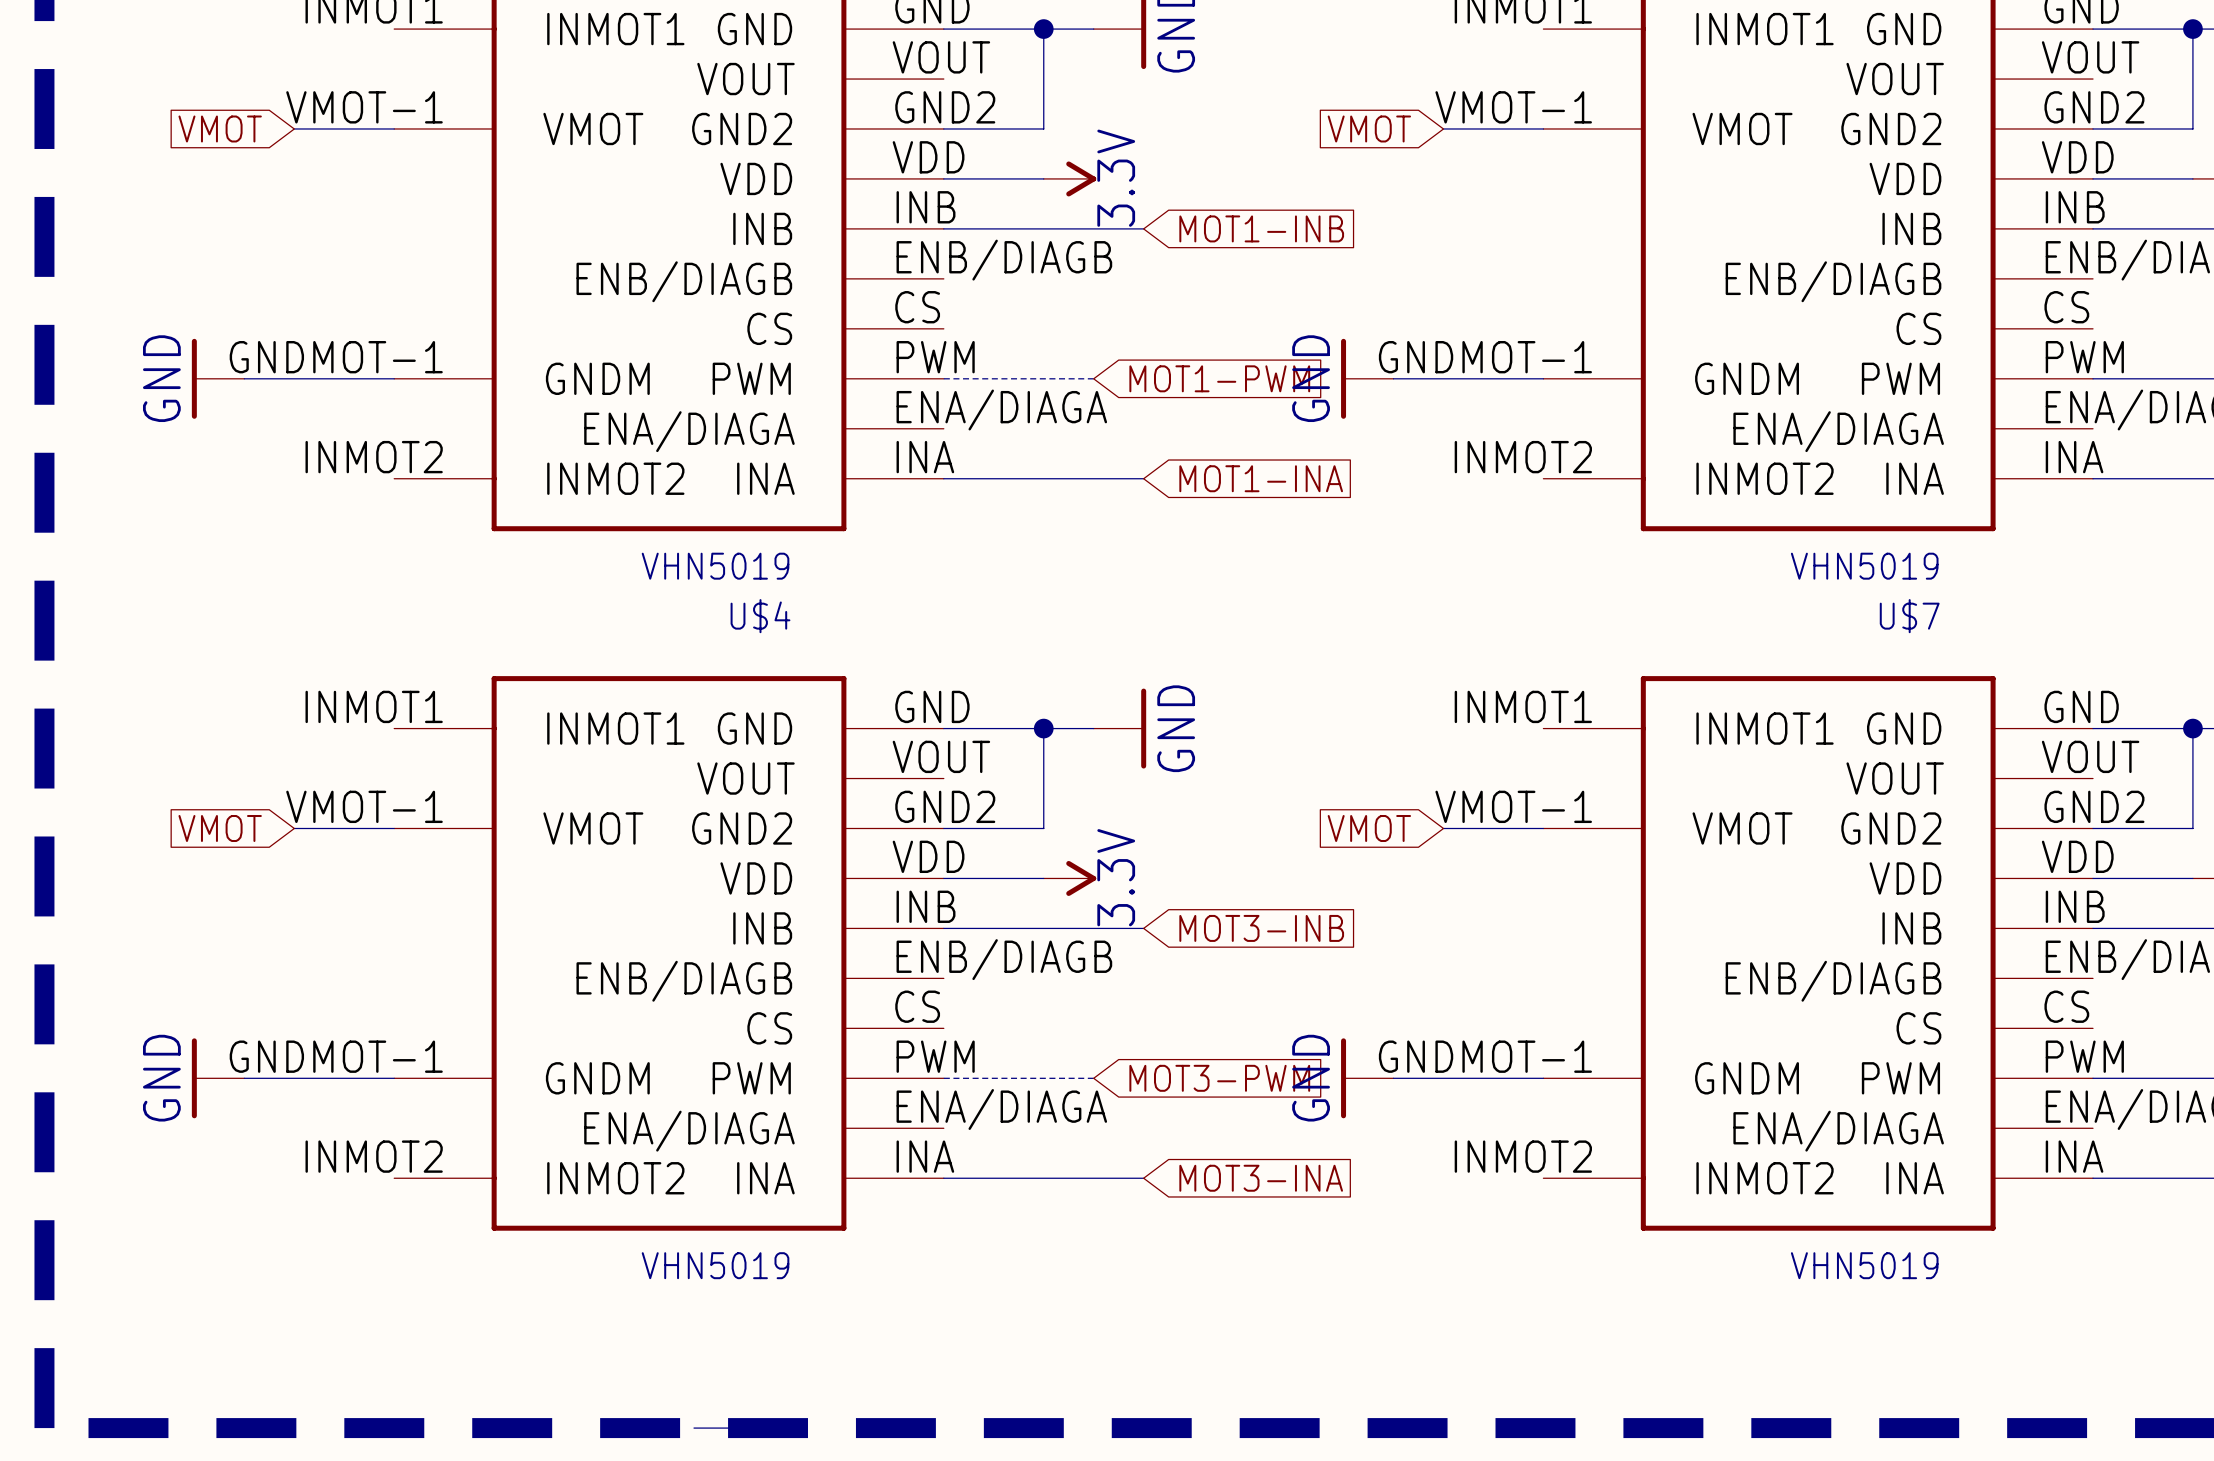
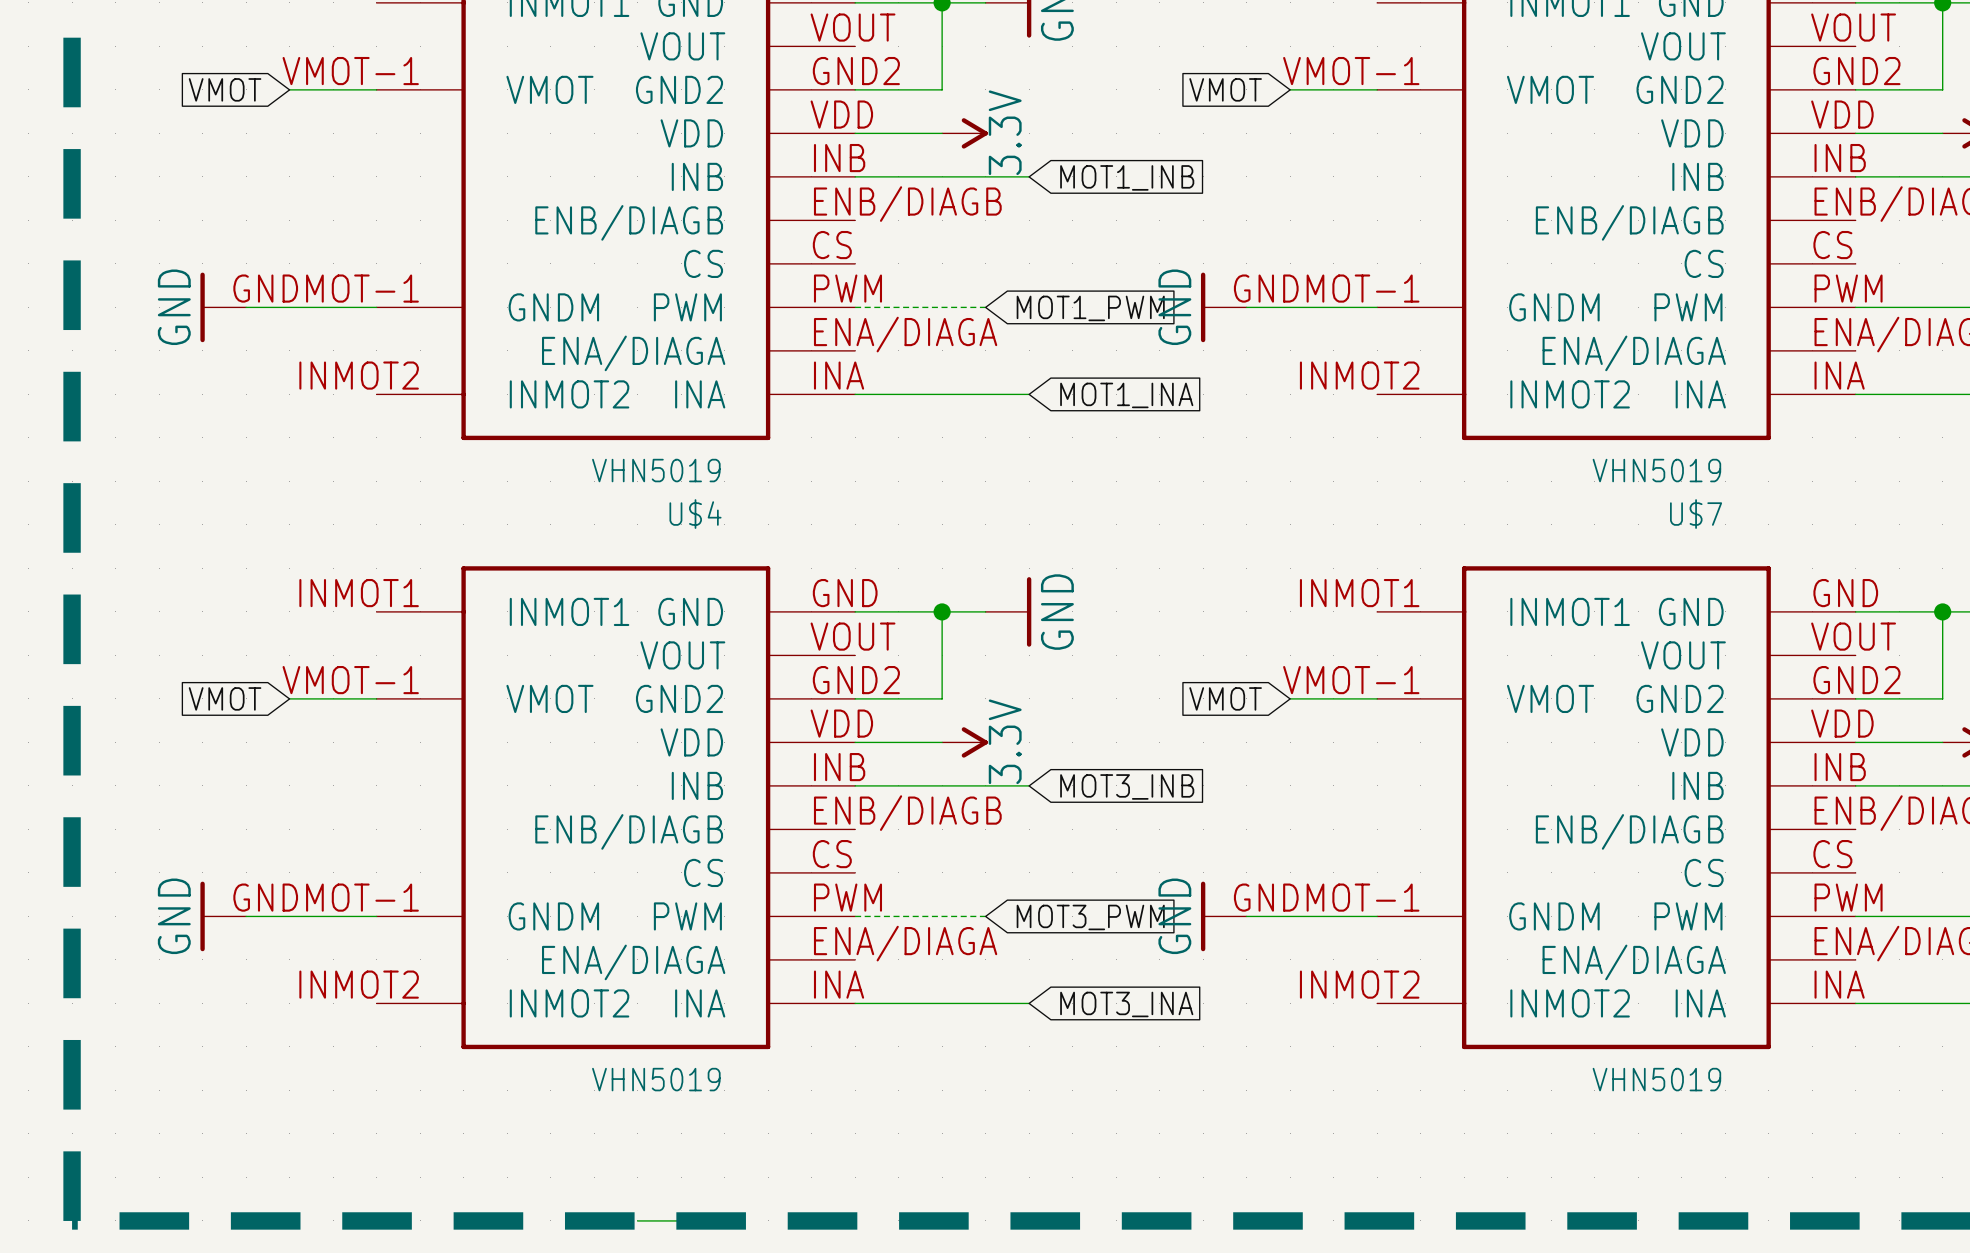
global label: MOT1-INB (1261, 228) -> MOT1_INB (1127, 177)
global label: MOT1-PWM (1219, 378) -> MOT1_PWM (1090, 308)
global label: MOT1-INA (1261, 478) -> MOT1_INA (1126, 395)
global label: MOT3-INB (1261, 928) -> MOT3_INB (1127, 786)
global label: MOT3-PWM (1219, 1078) -> MOT3_PWM (1090, 917)
global label: MOT3-INA (1261, 1178) -> MOT3_INA (1126, 1004)

